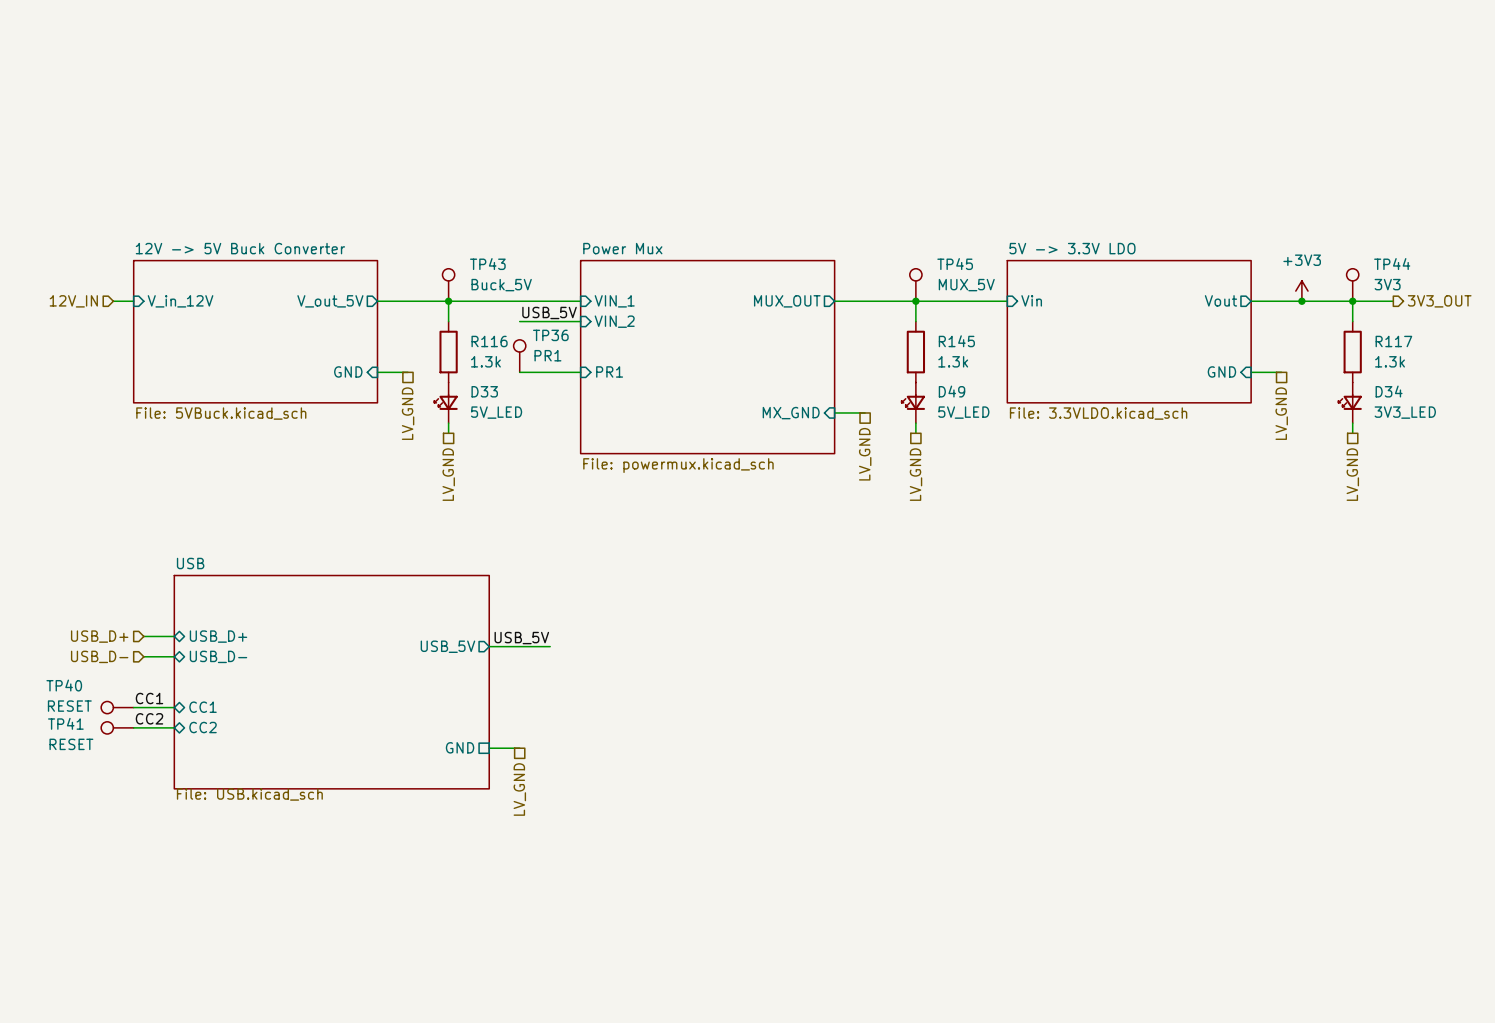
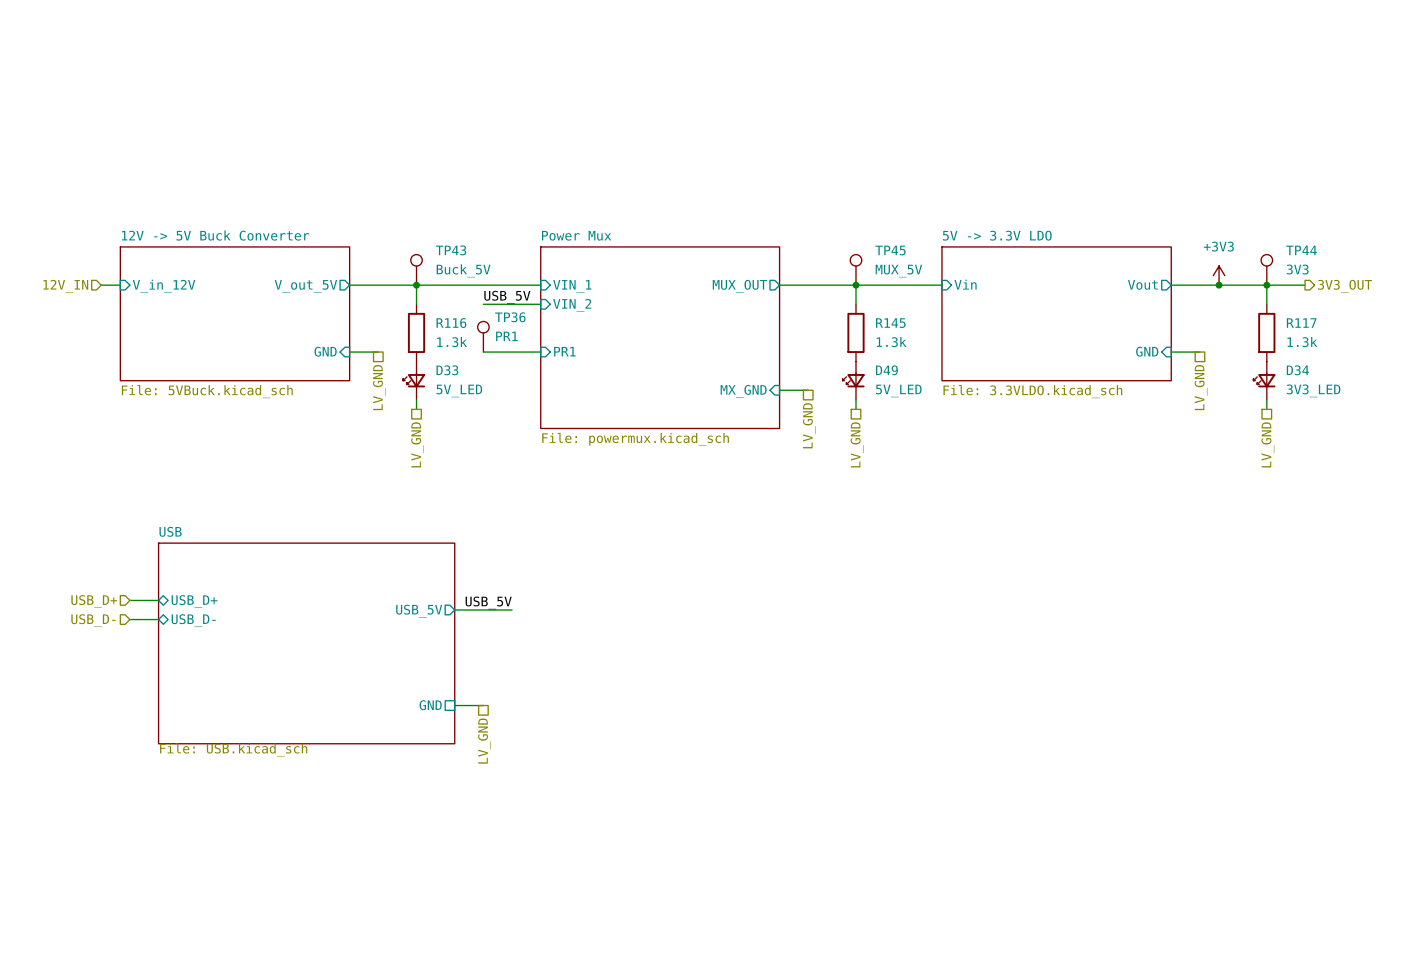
label: CC1 (149, 698) -> none
TP40: RESET (117, 707) -> none
wire: (133, 707) (174, 707) -> none
sheet pin: CC1 (203, 707) -> none
label: CC2 (149, 718) -> none
TP41: RESET (117, 727) -> none
wire: (133, 727) (174, 727) -> none
sheet pin: CC2 (203, 727) -> none

